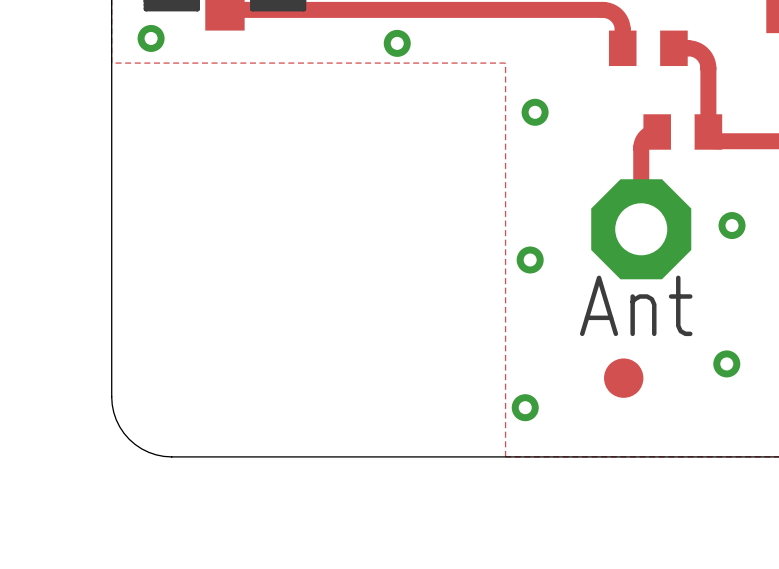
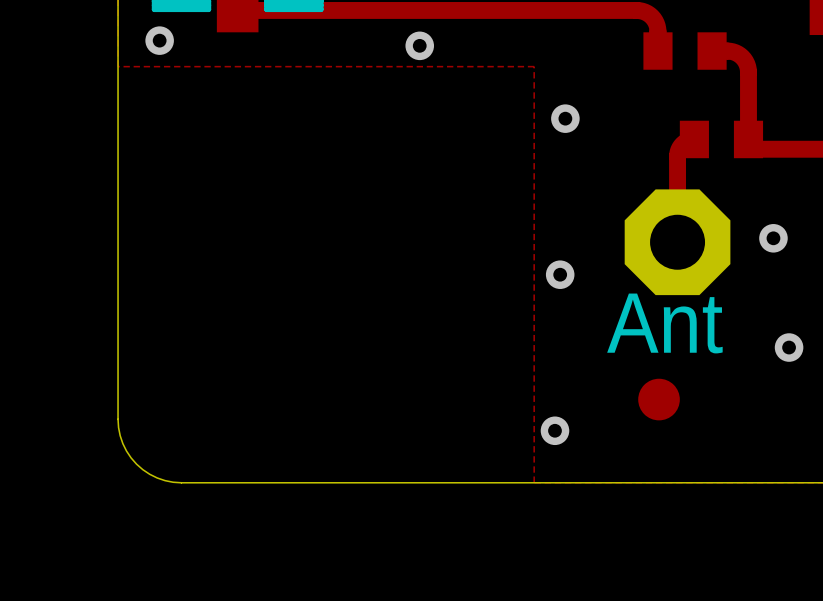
via position: (726, 363) -> (789, 347)

